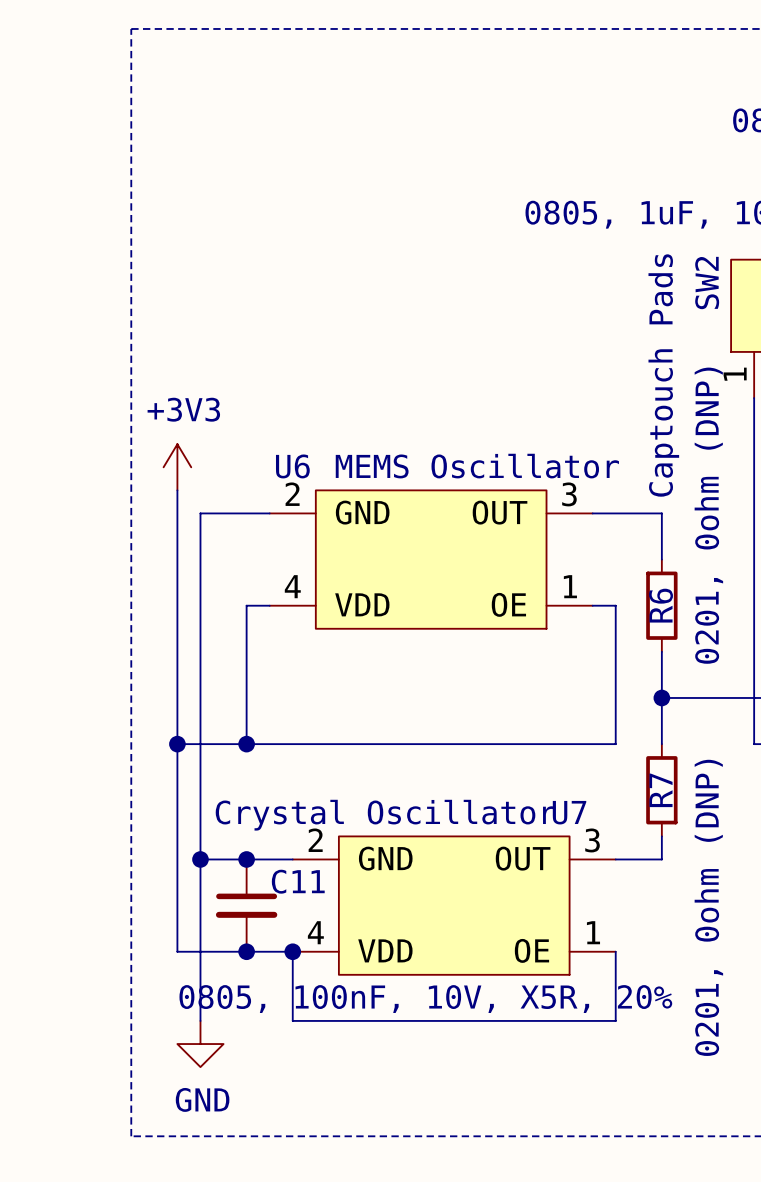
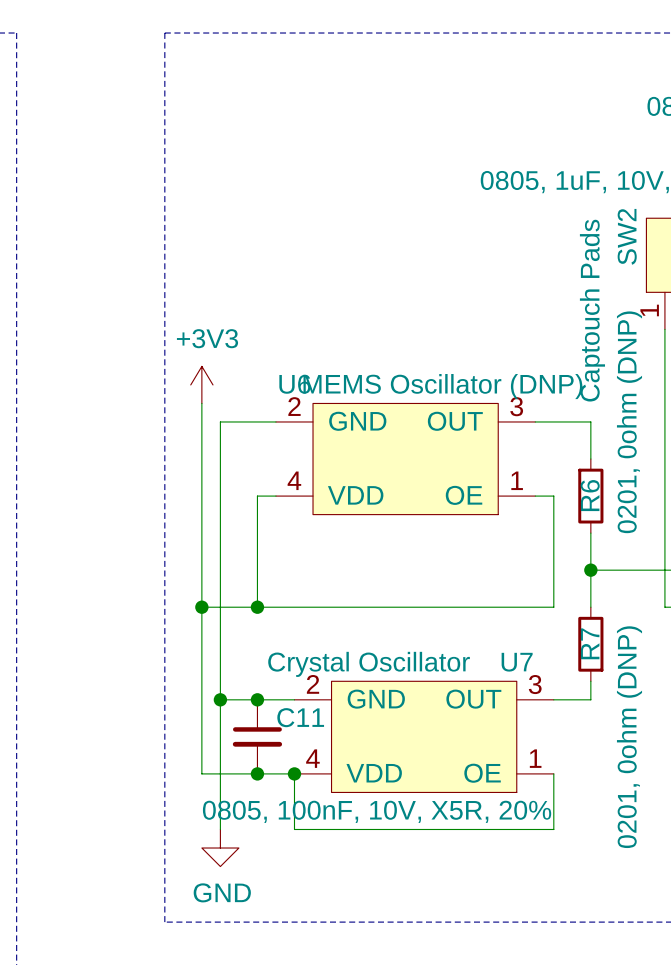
U6 value: MEMS Oscillator (477, 466) -> MEMS Oscillator (DNP) (442, 386)

